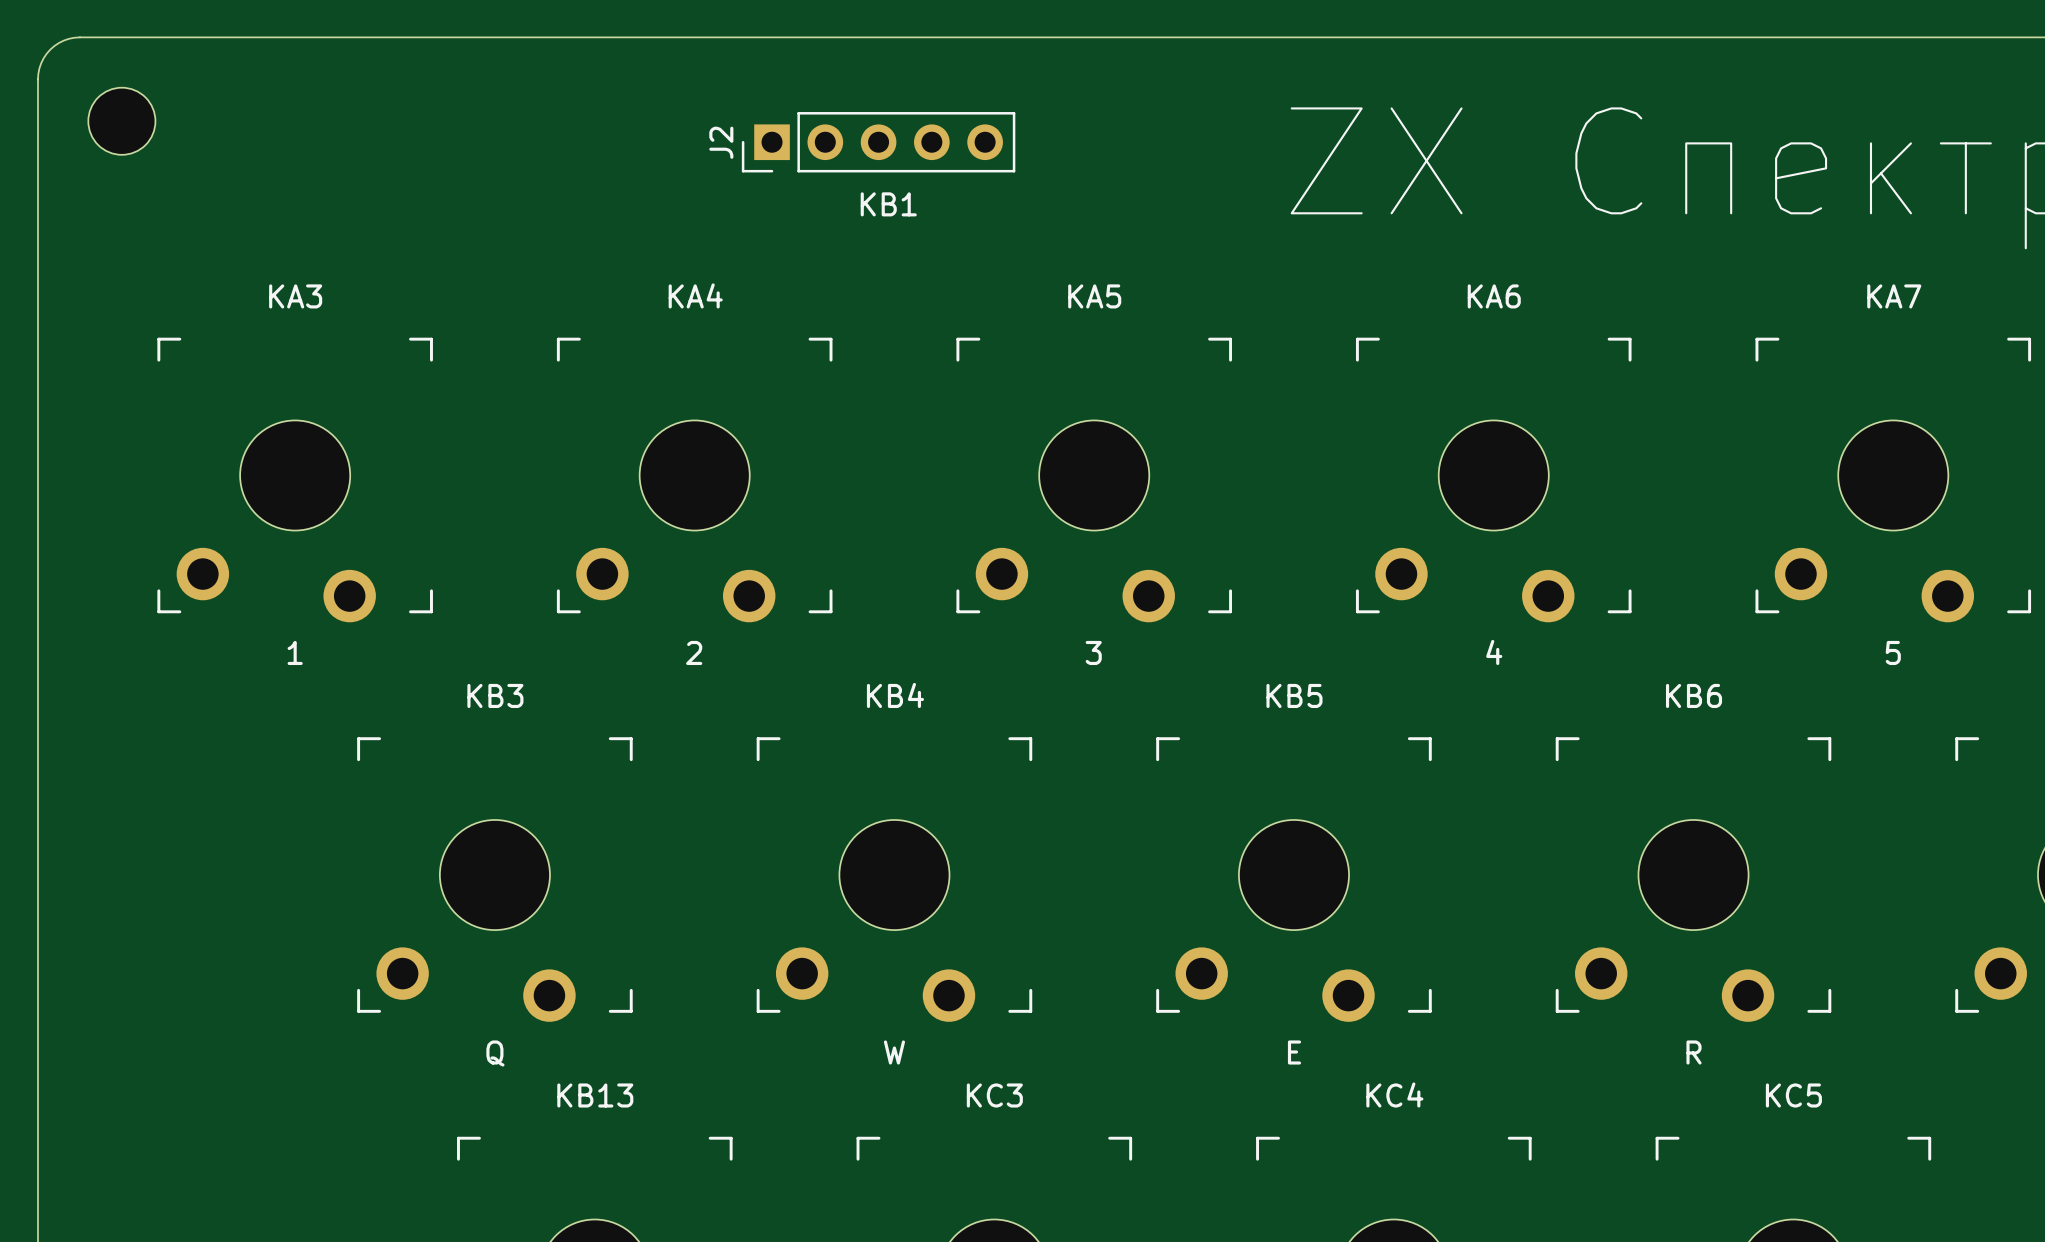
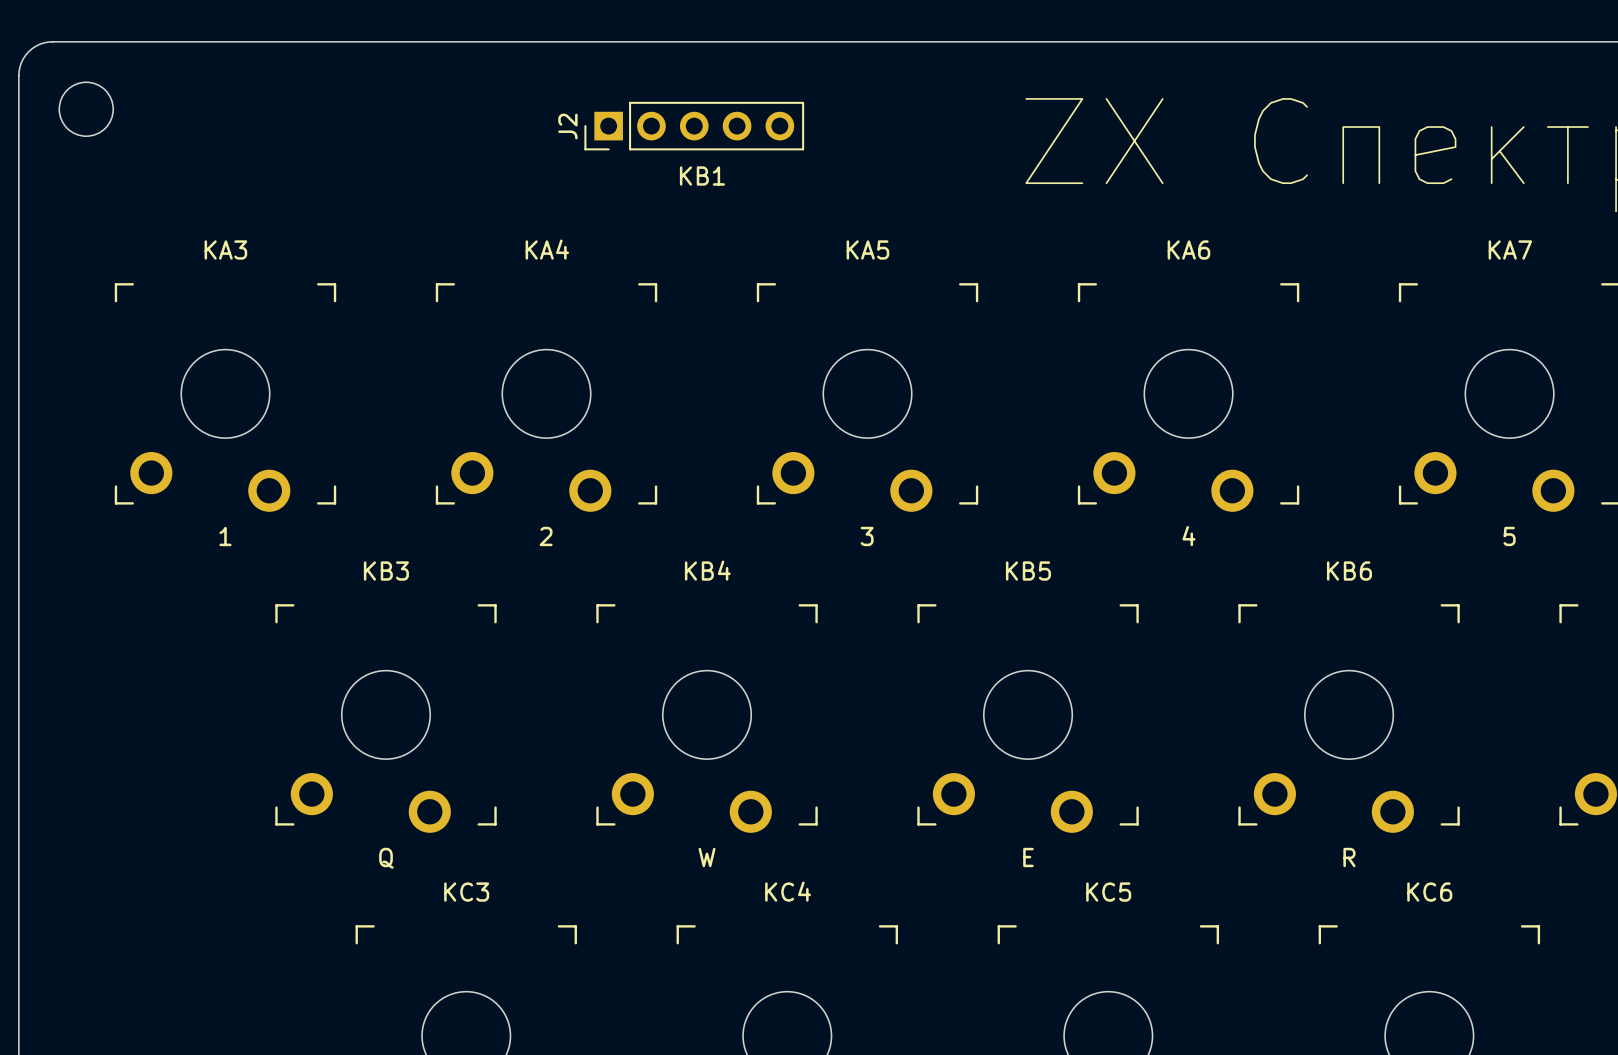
KC4 name: KC4 (1394, 1094) -> KC5 (1108, 892)
KB13 name: KB13 (595, 1095) -> KC3 (466, 892)
KC3 name: KC3 (994, 1095) -> KC4 (788, 891)
KC5 name: KC5 (1793, 1095) -> KC6 (1429, 892)

